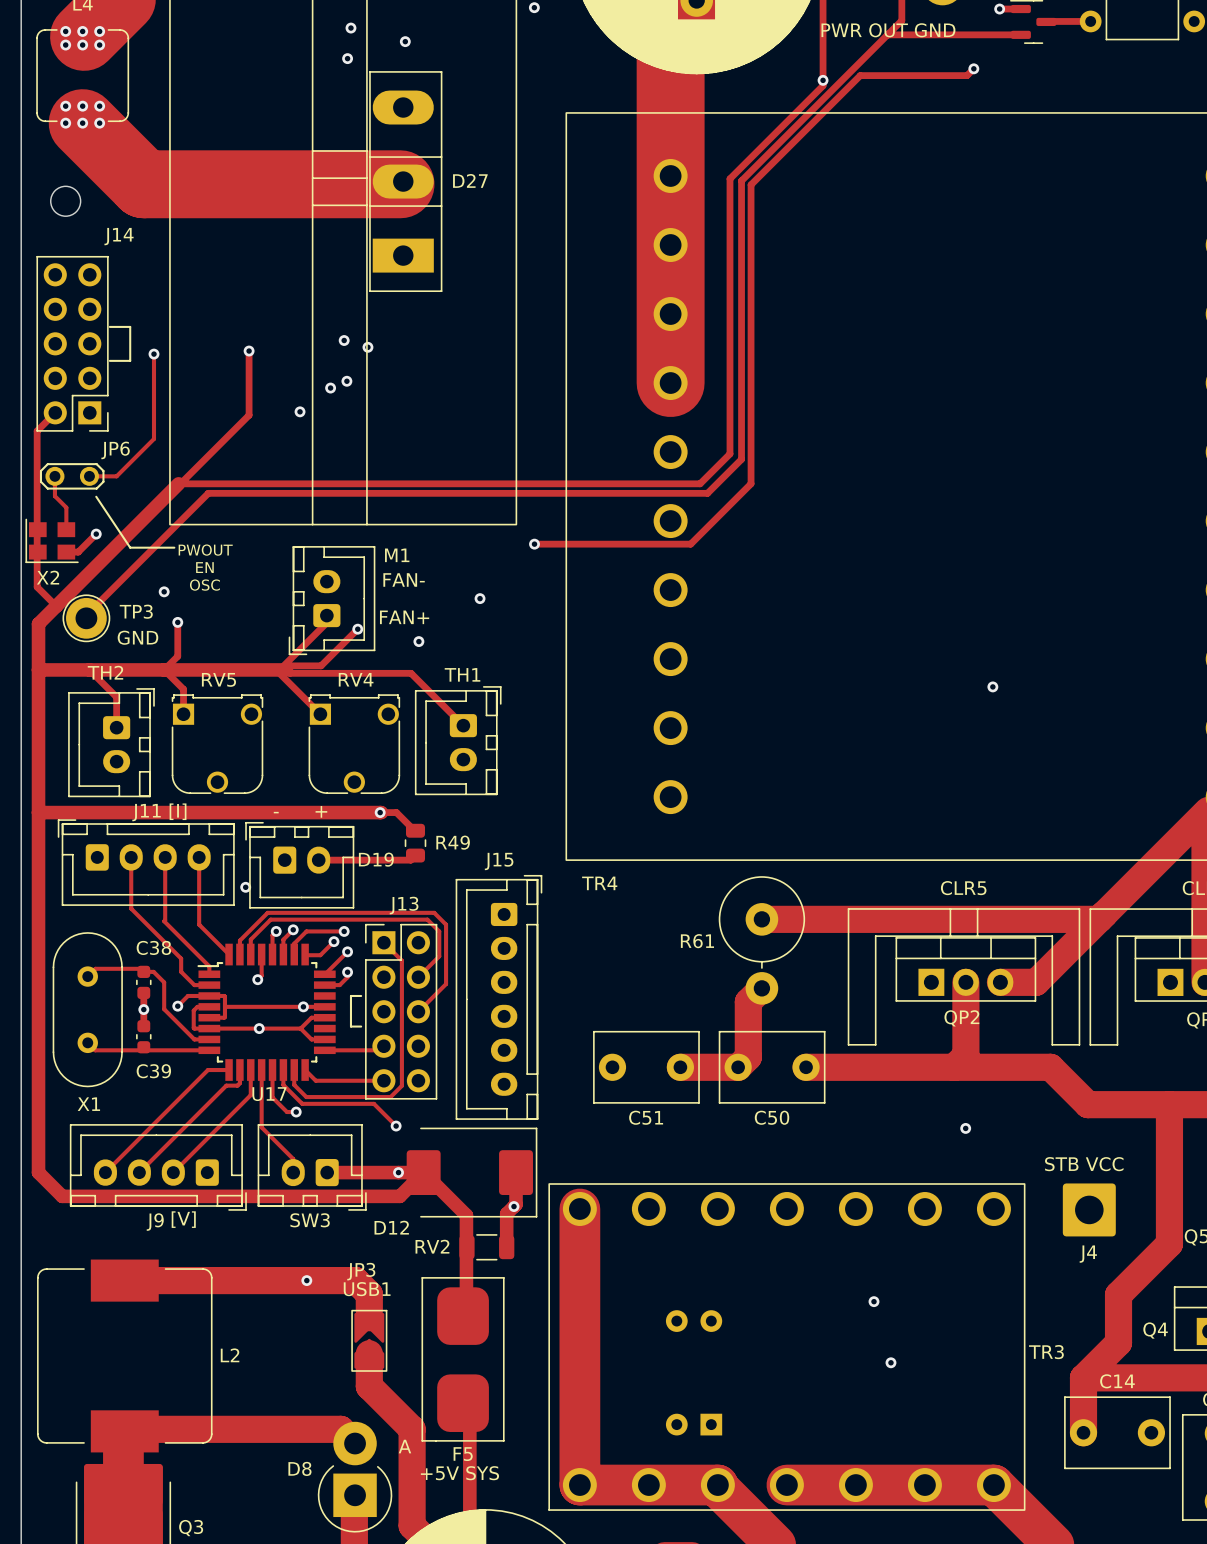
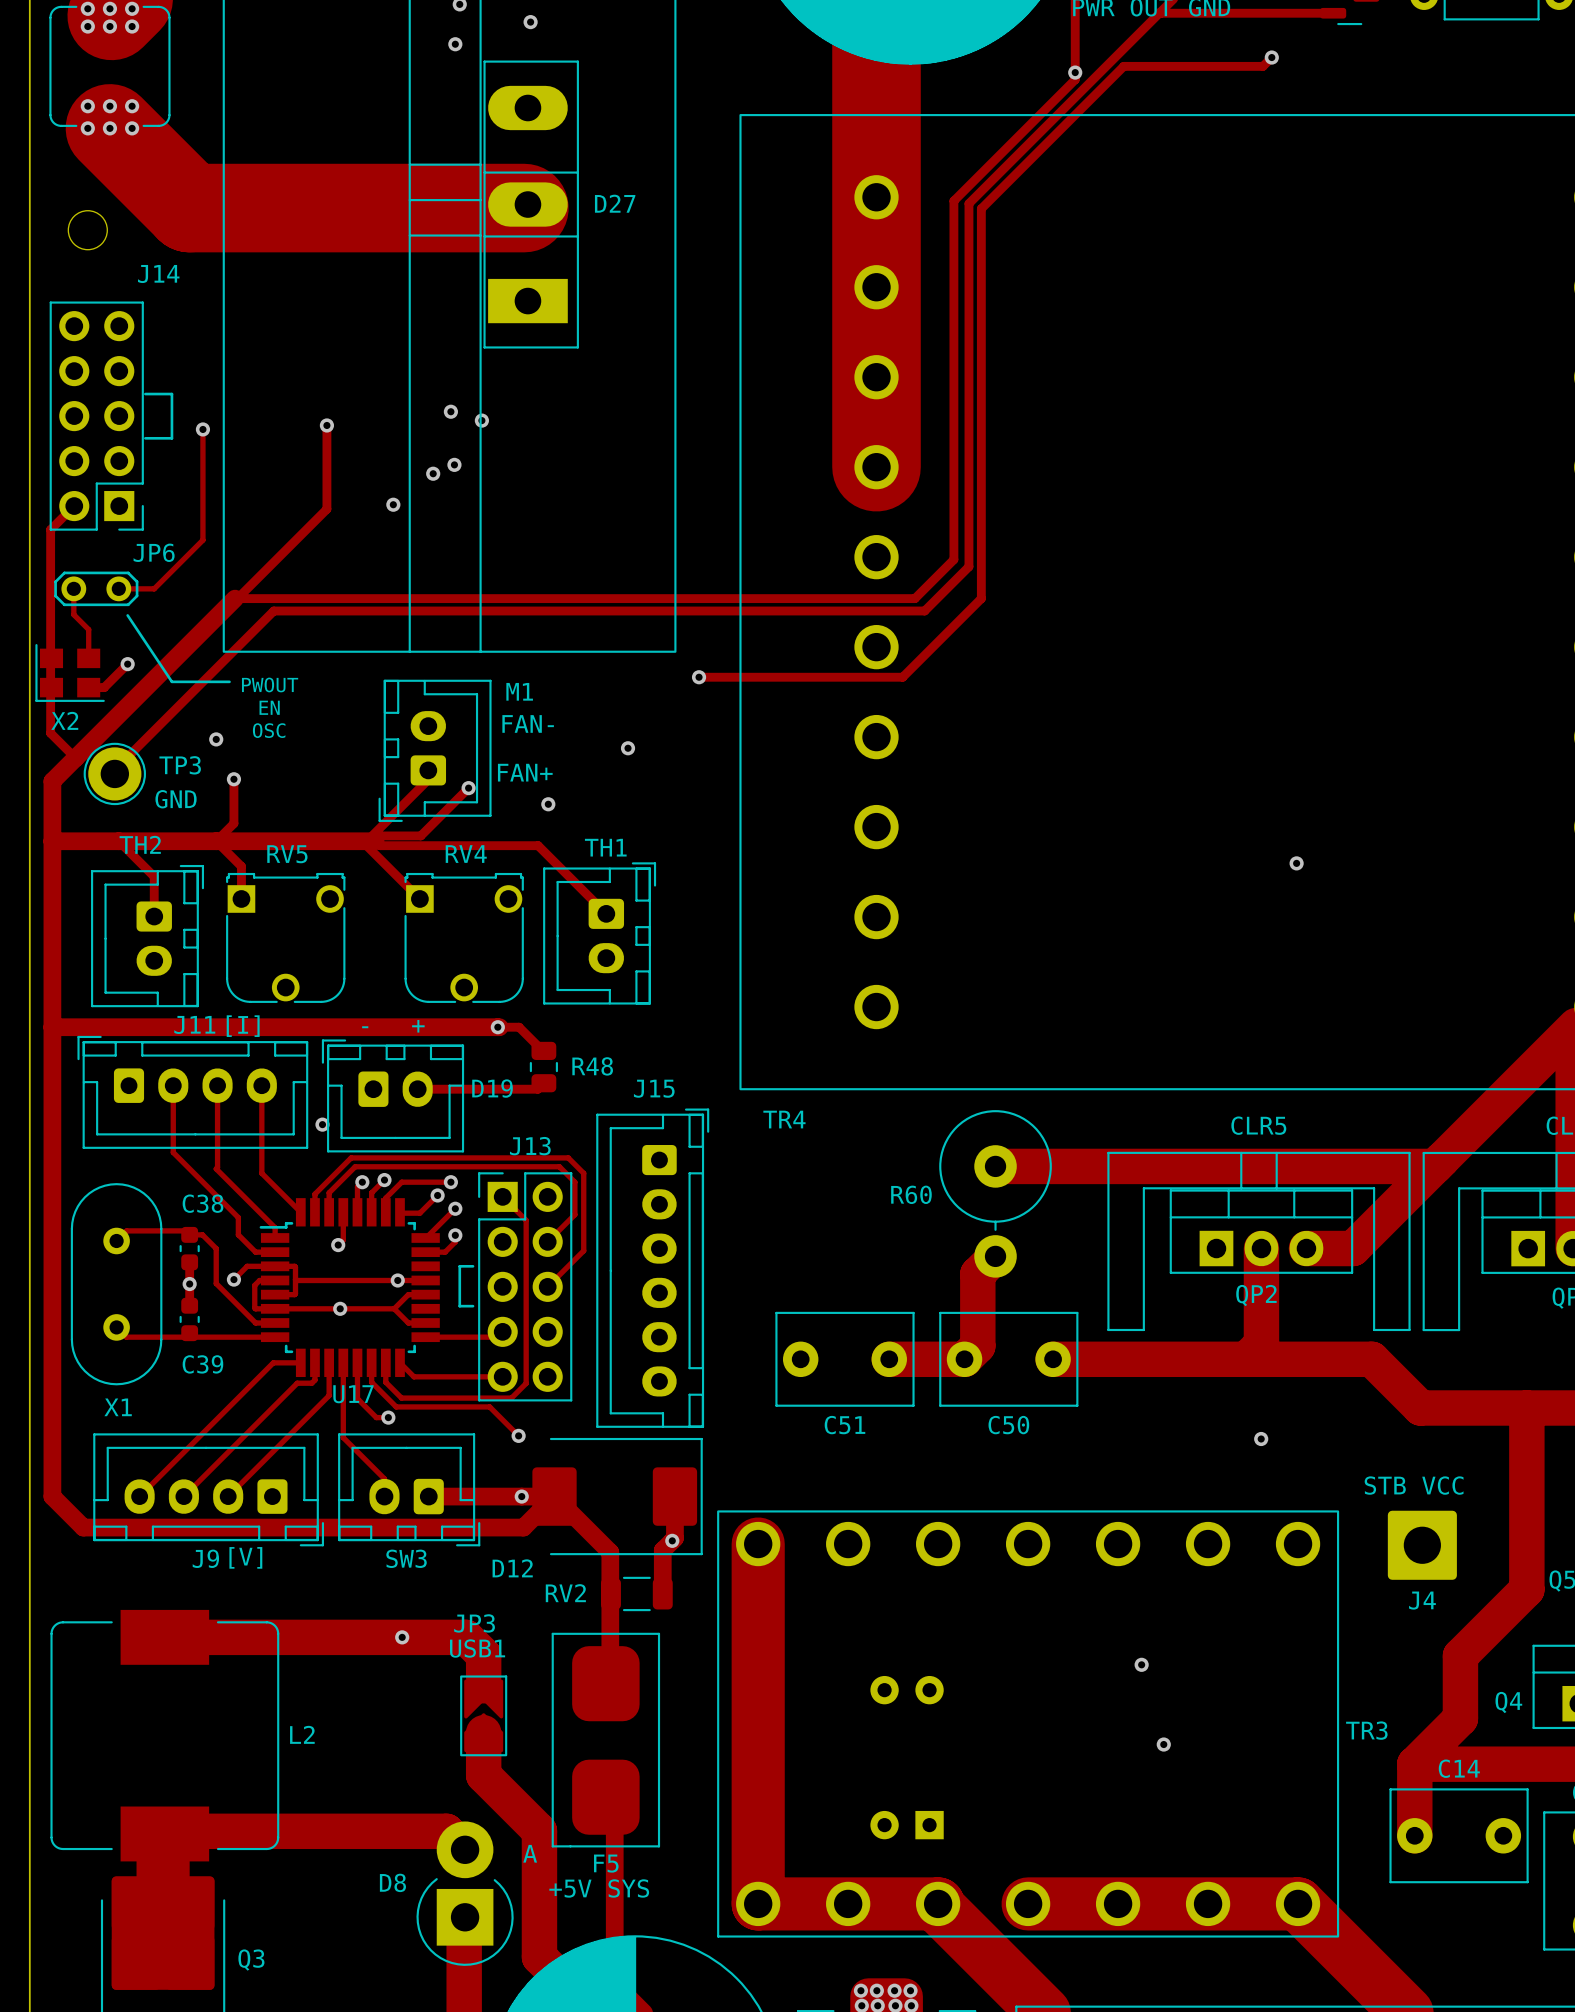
R49 name: R49 (453, 842) -> R48 (592, 1066)
R61 name: R61 (697, 941) -> R60 (911, 1194)

